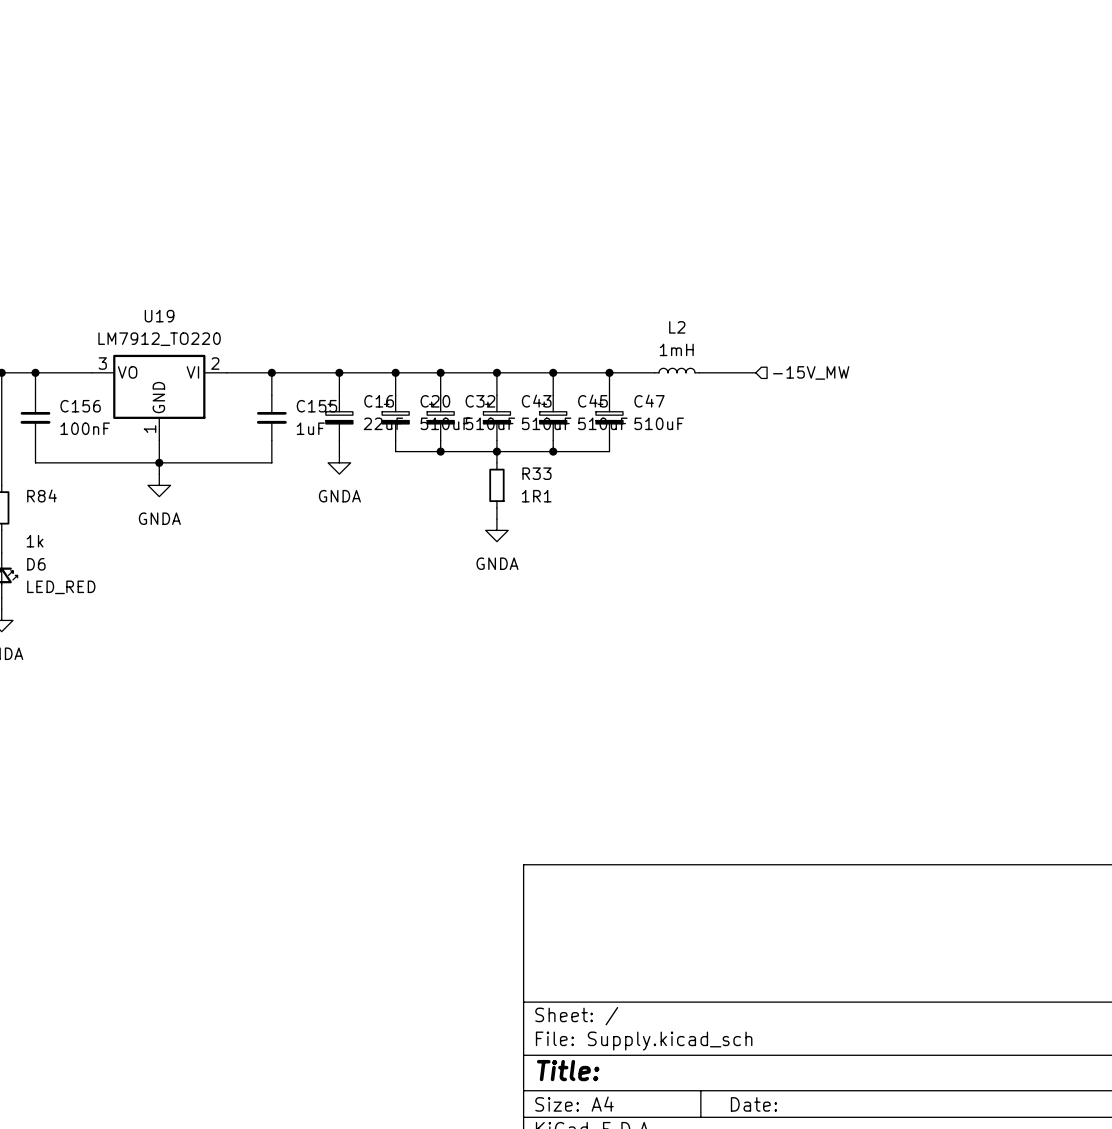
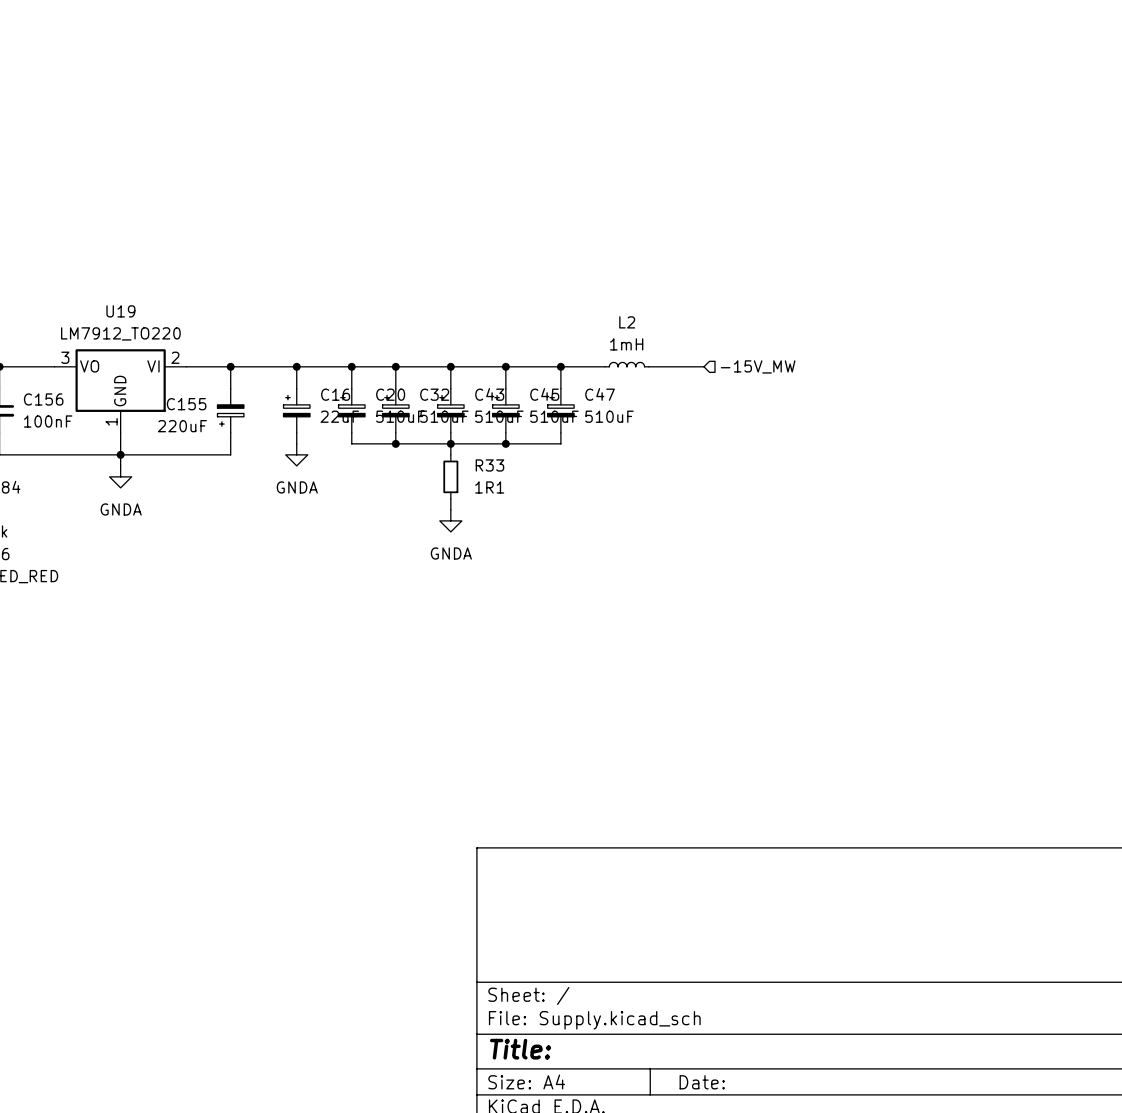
C155 symbol: [256, 395, 287, 441] -> [217, 388, 244, 433]
C155 name position: C155 (316, 406) -> C155 (186, 404)
C155 value: 1uF (310, 428) -> 220uF (182, 426)

